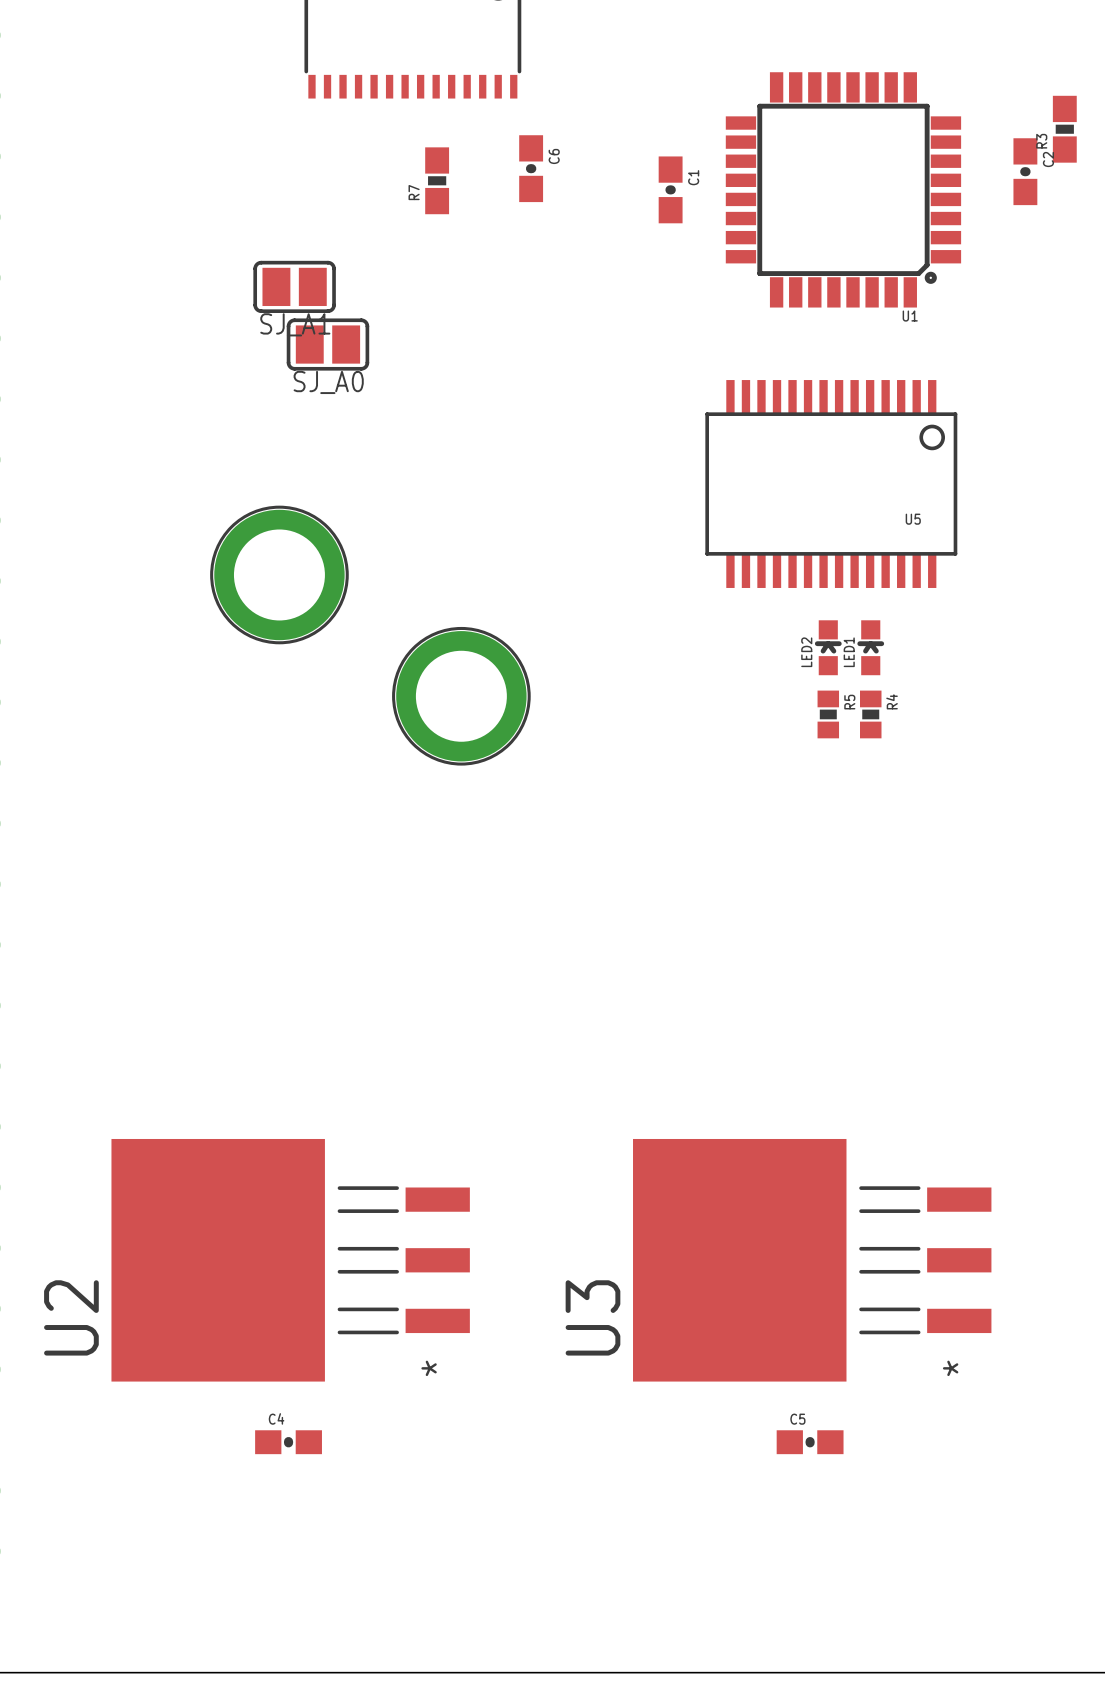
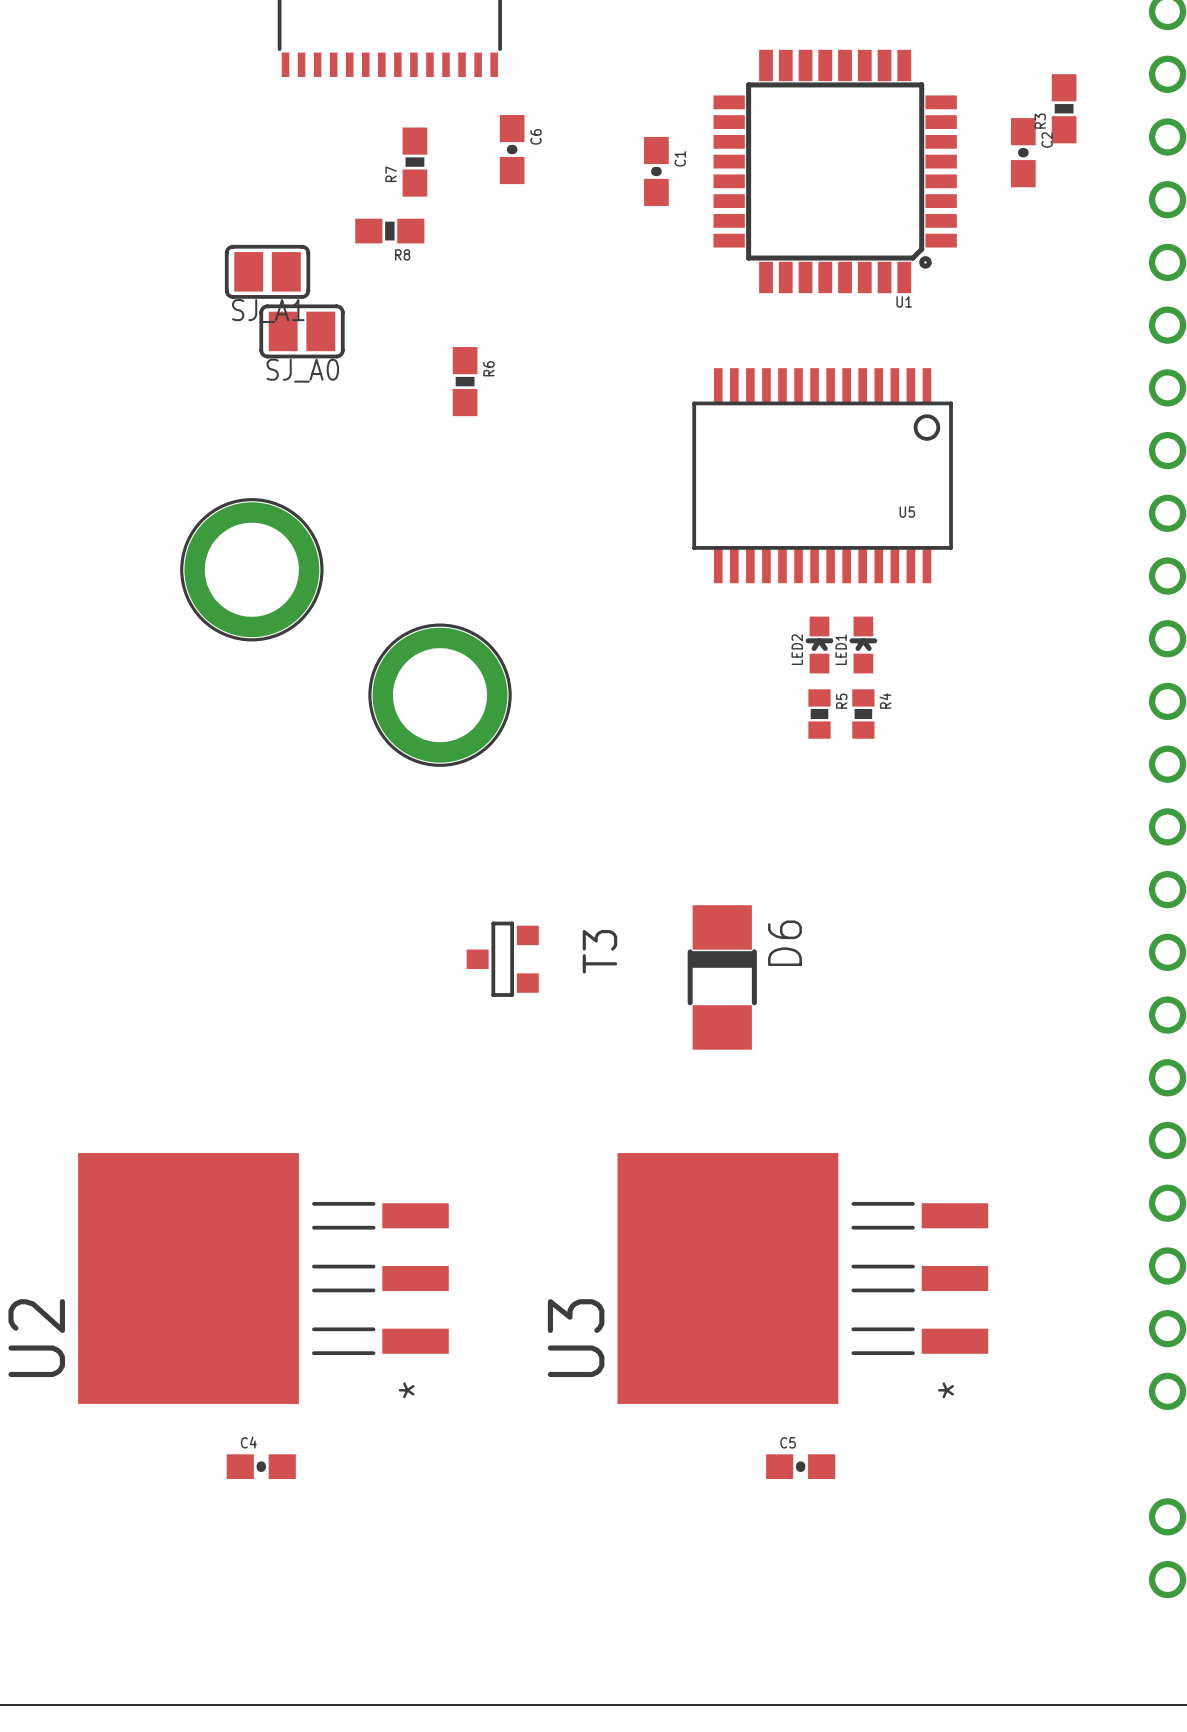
R8: none -> (389, 231)
R6: none -> (465, 381)
T3: none -> (502, 959)
D6: none -> (722, 977)

